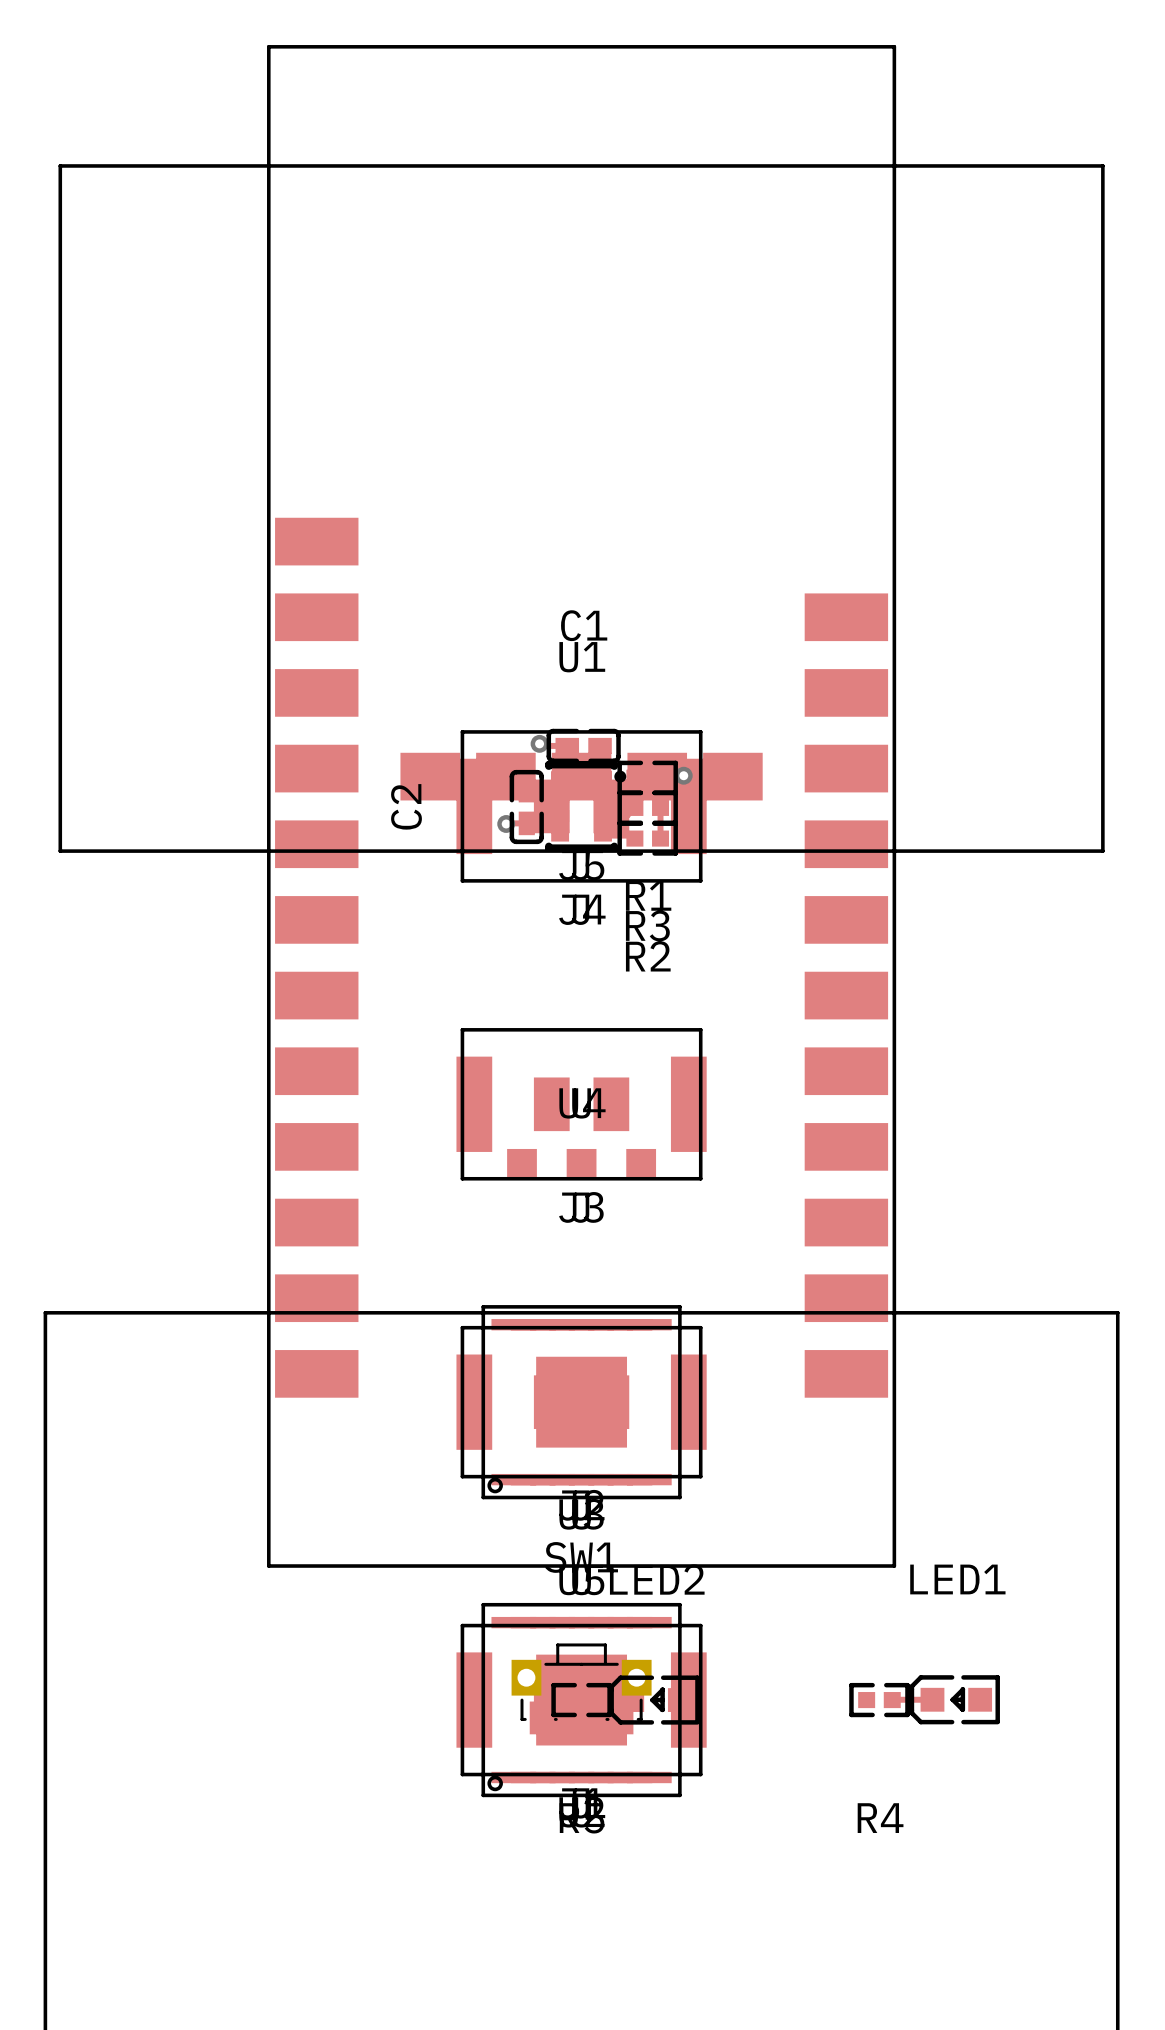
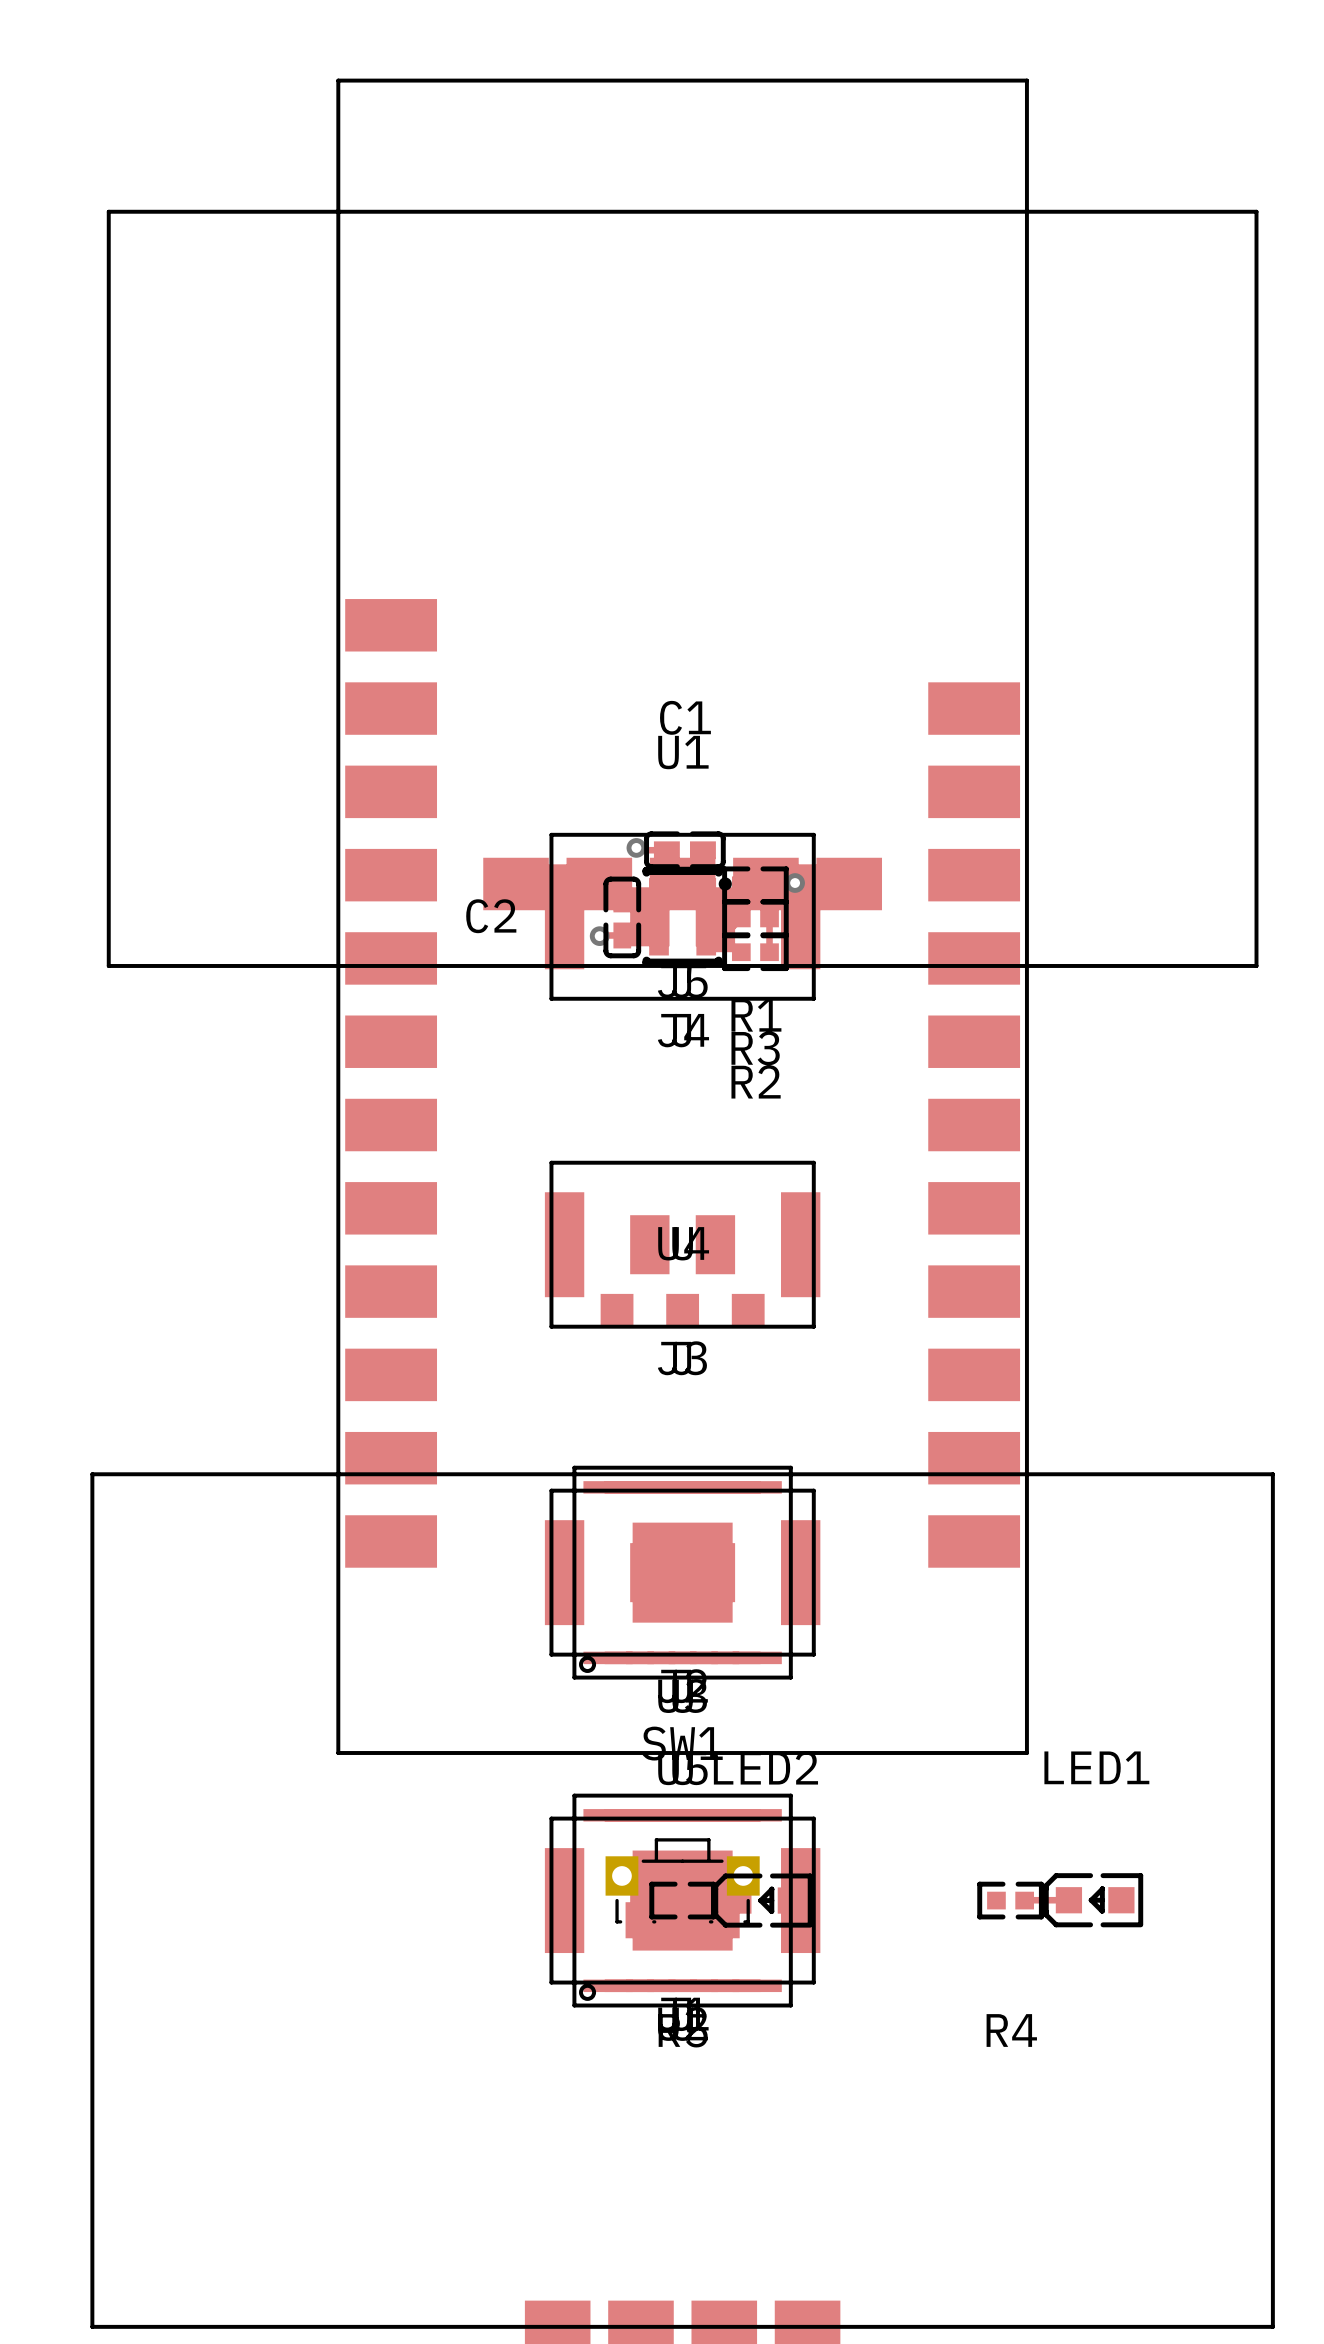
C2 name rotation: 0° (406, 806) -> 90° clockwise (491, 916)

